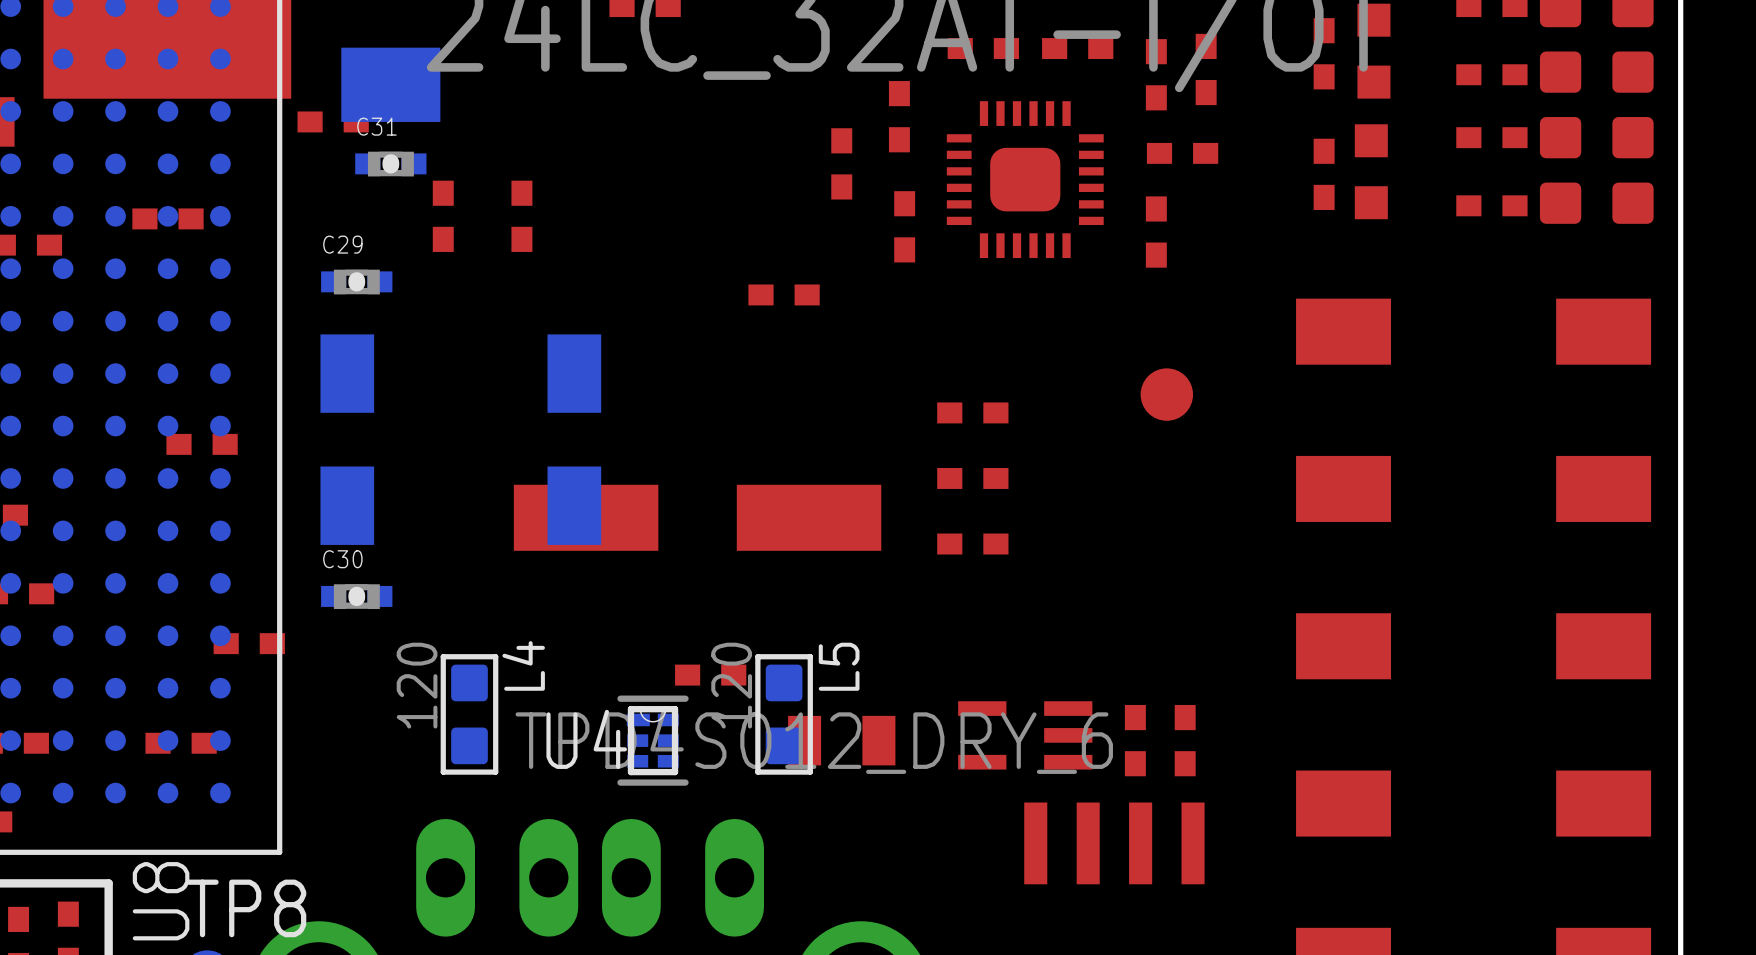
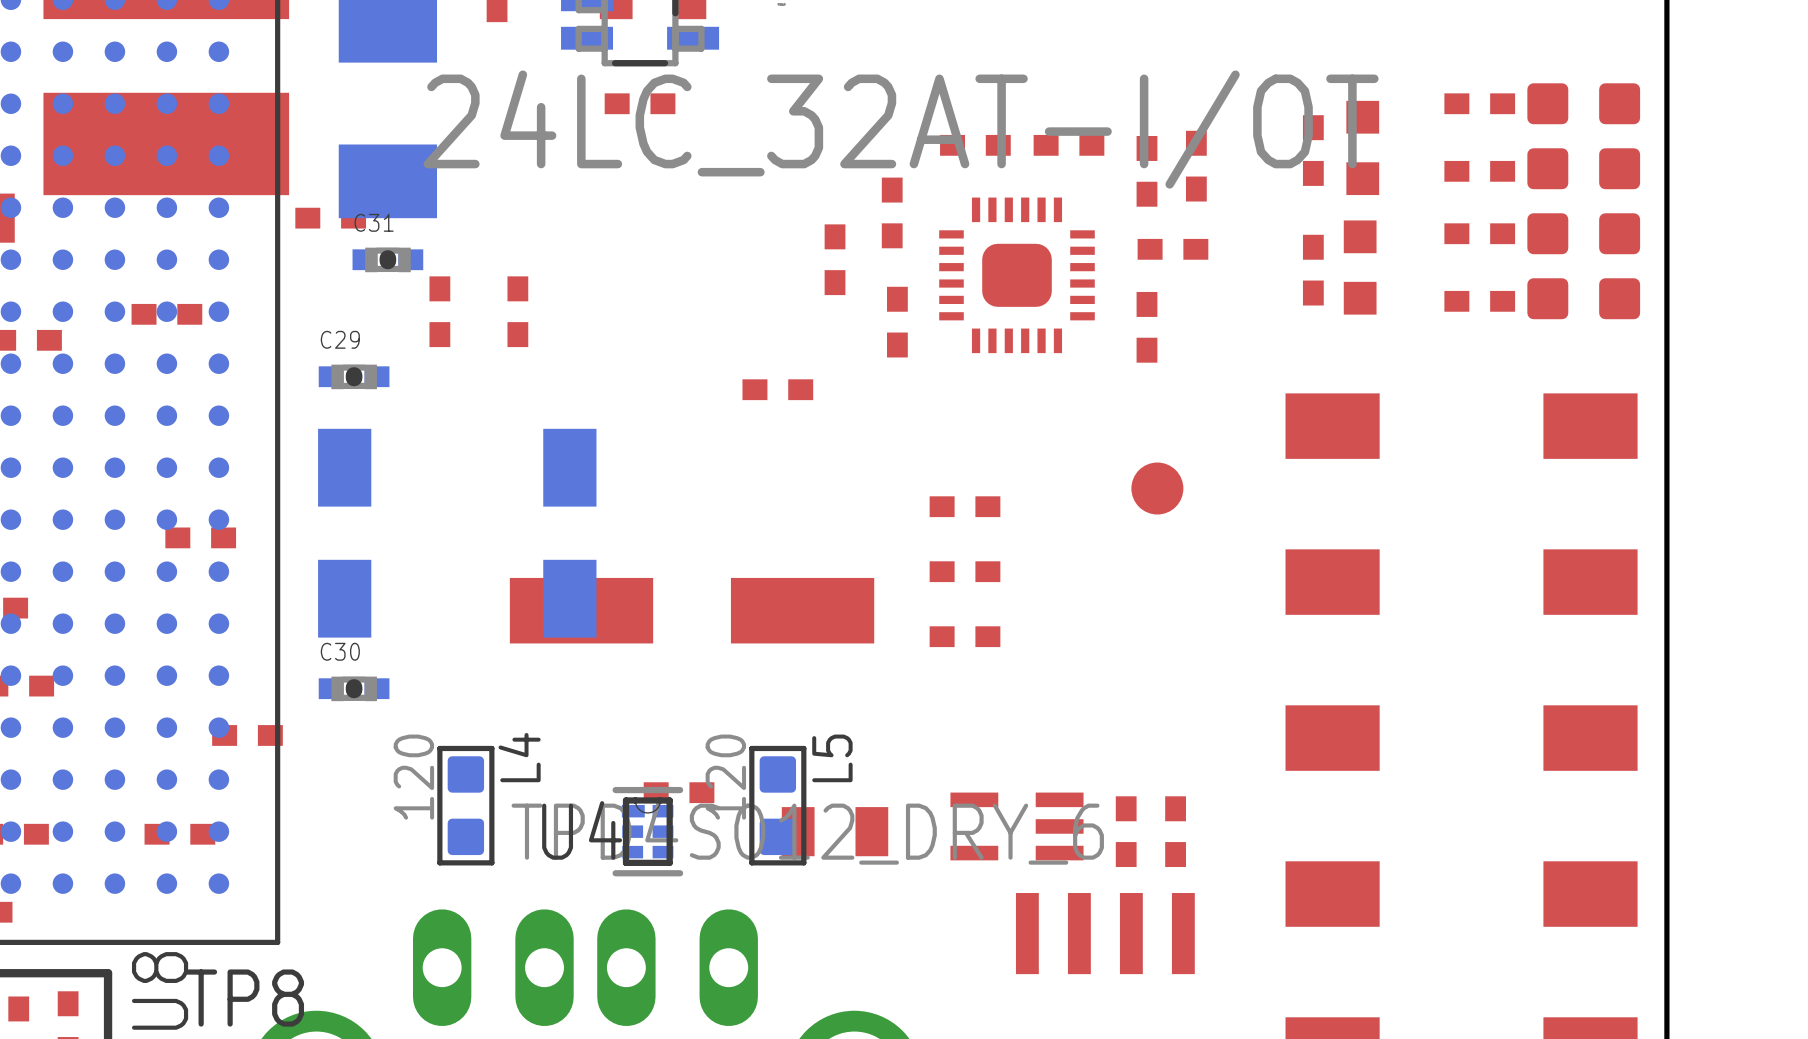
part position: (710, 675) -> (679, 792)

